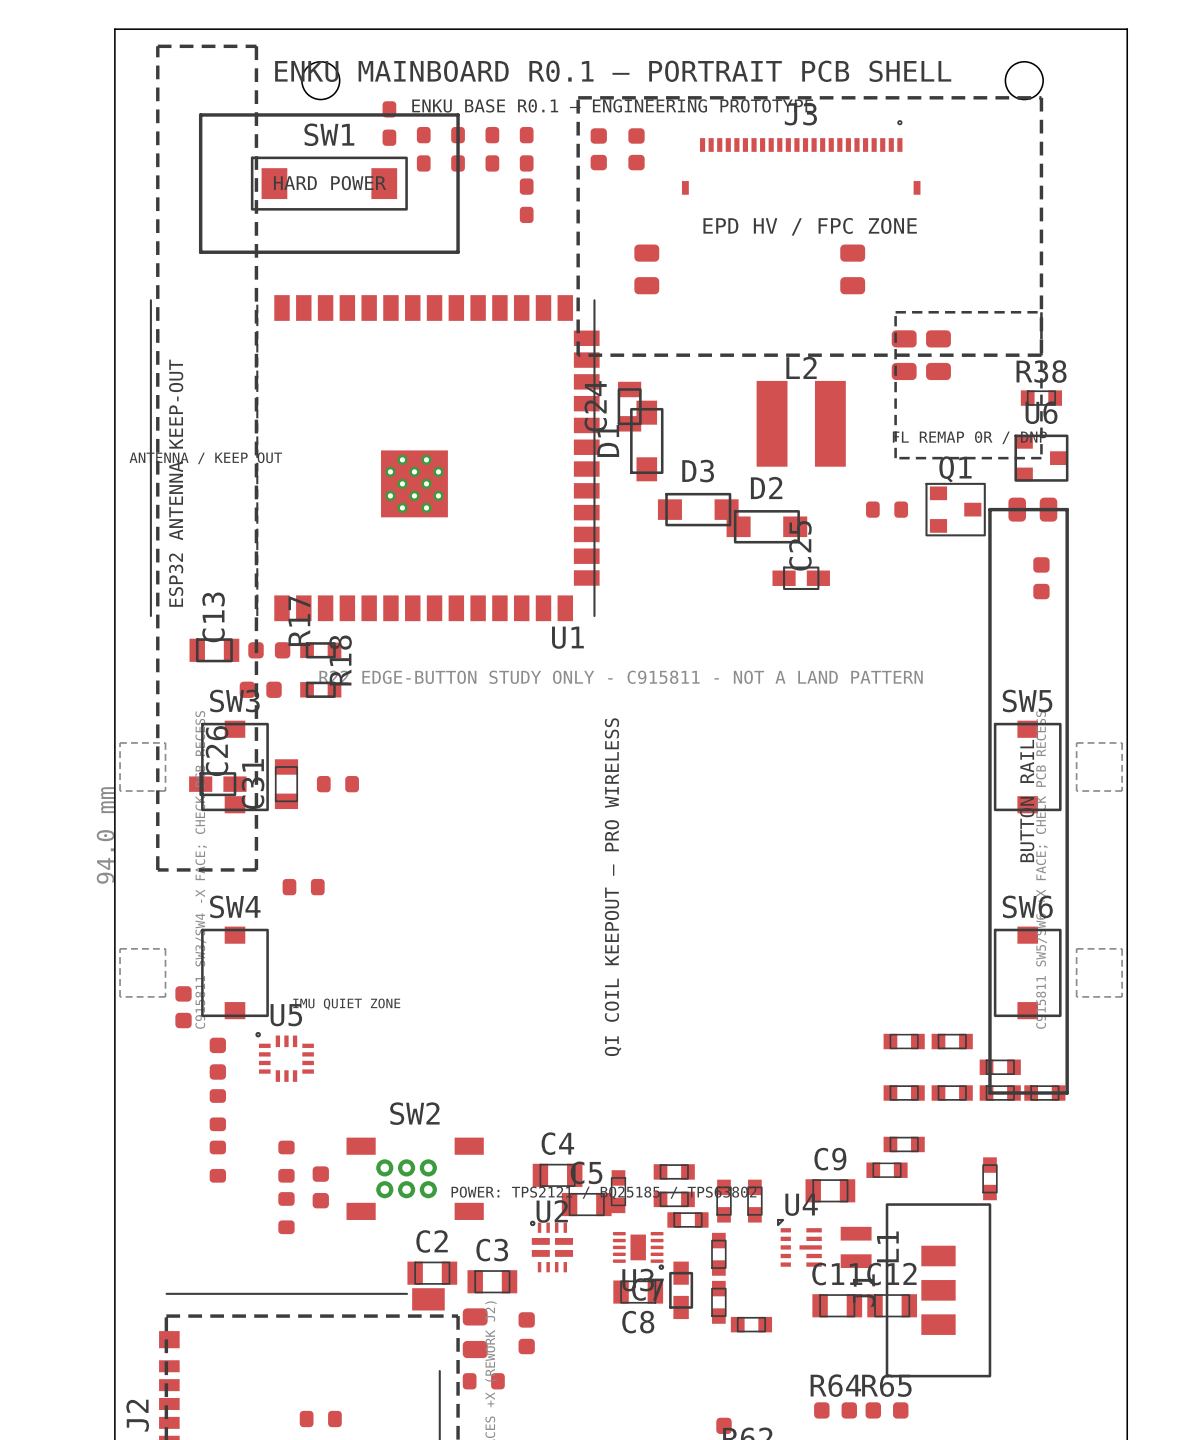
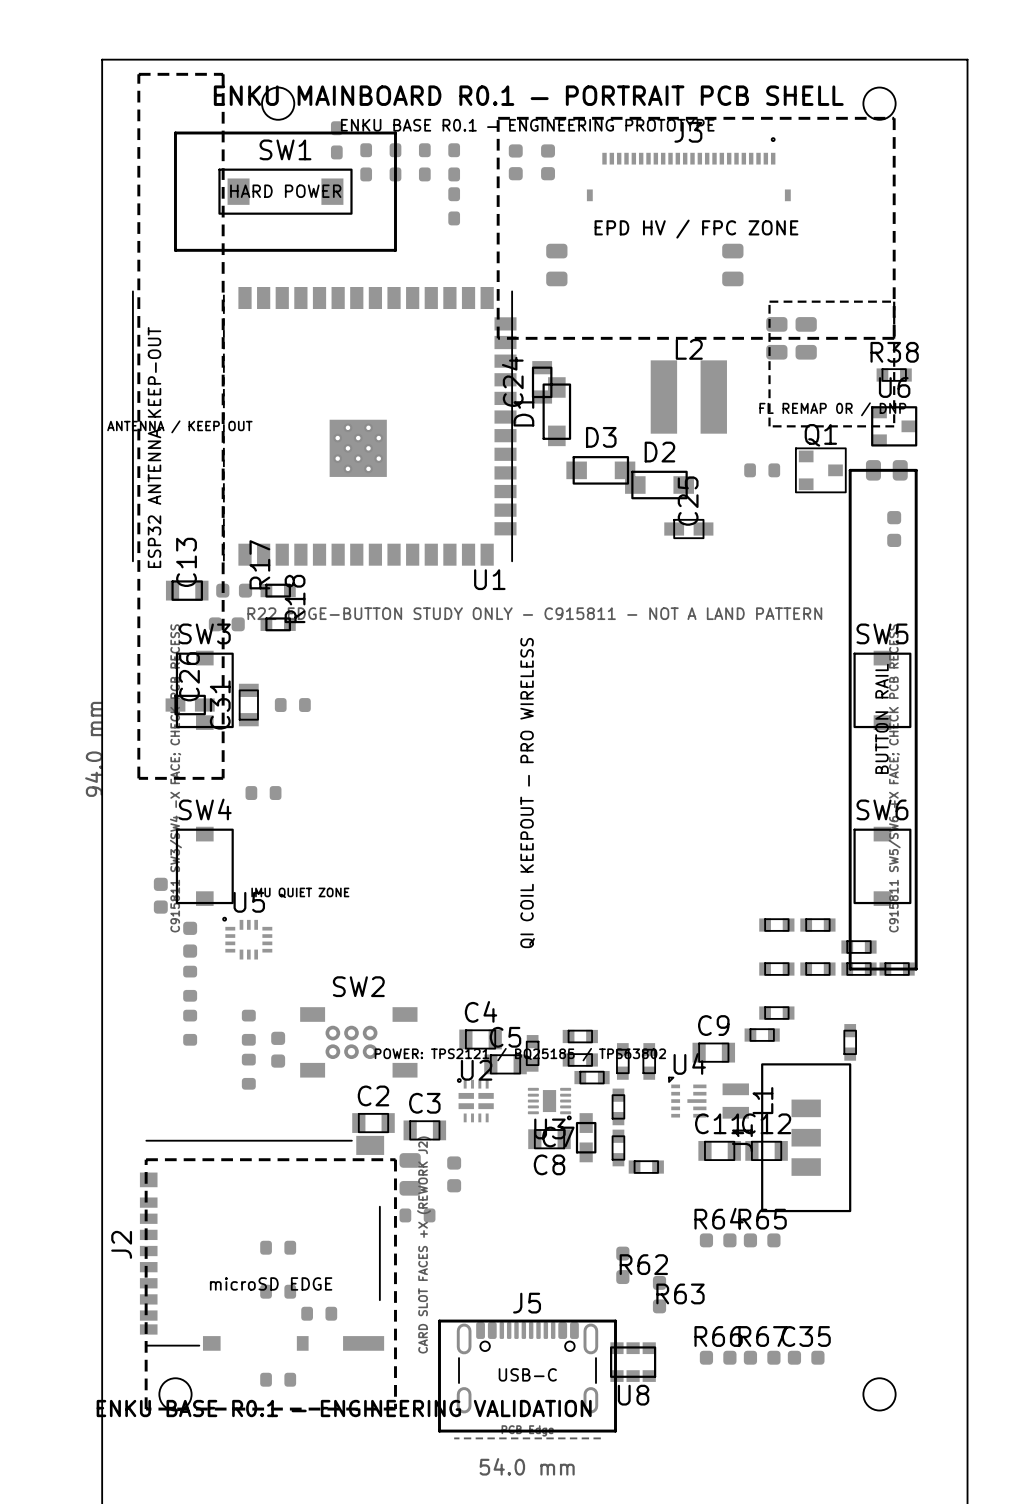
line: (120, 742) (165, 742) (165, 791) (120, 791) (120, 742) -> none
line: (1076, 742) (1122, 742) (1122, 791) (1076, 791) (1076, 742) -> none
line: (120, 948) (120, 996) (165, 996) (165, 948) (120, 948) -> none
line: (1076, 948) (1122, 948) (1122, 996) (1076, 996) (1076, 948) -> none

